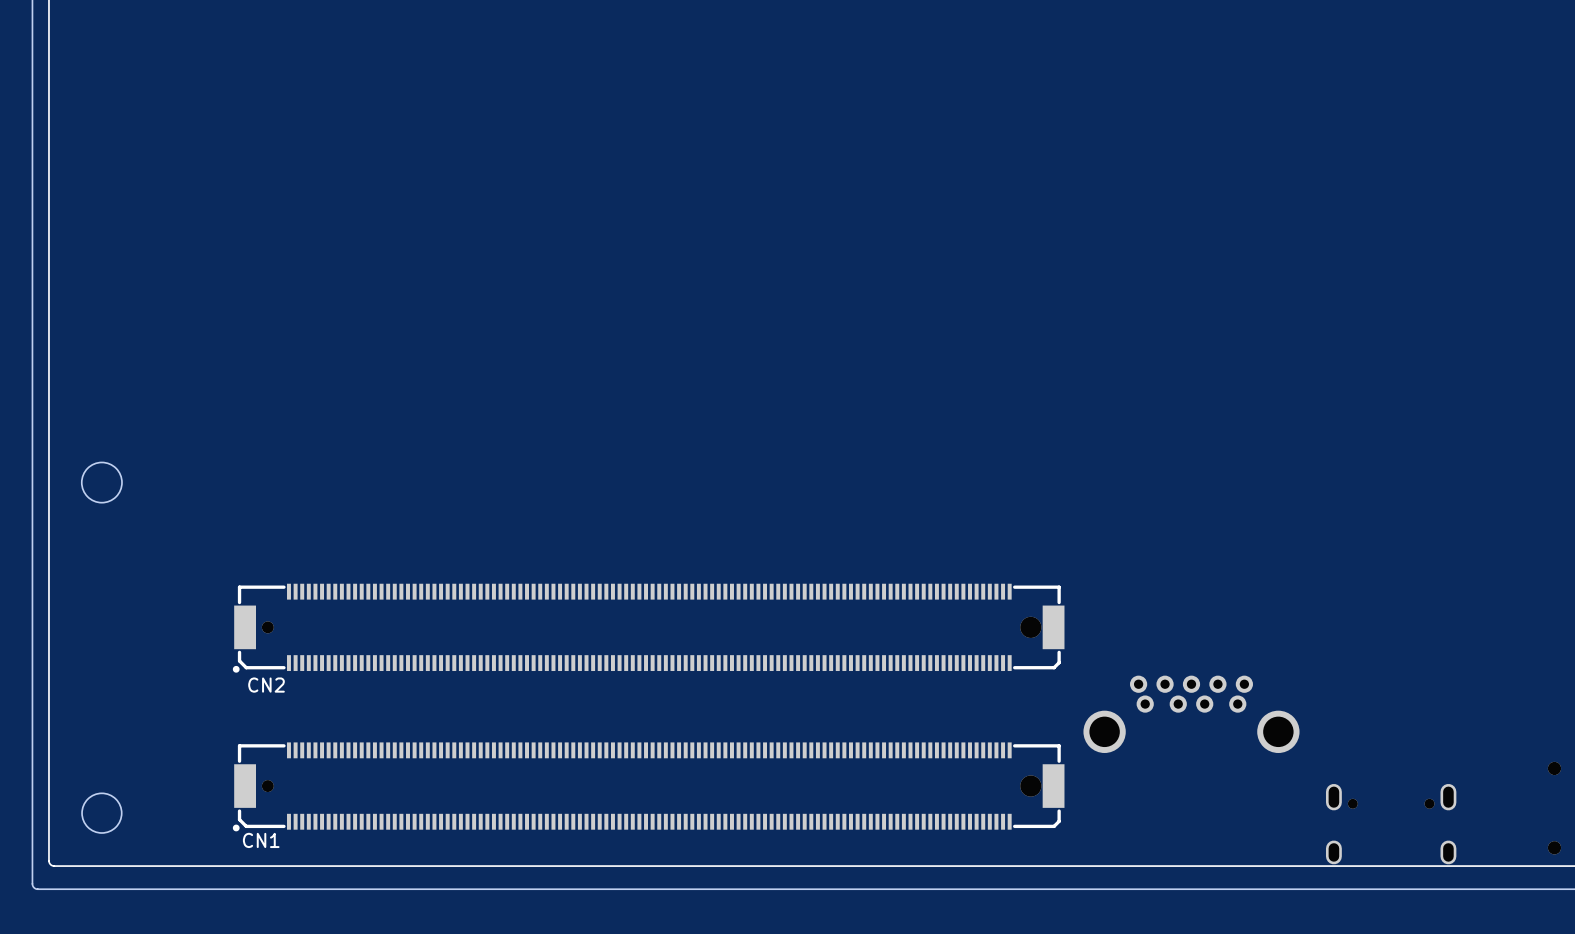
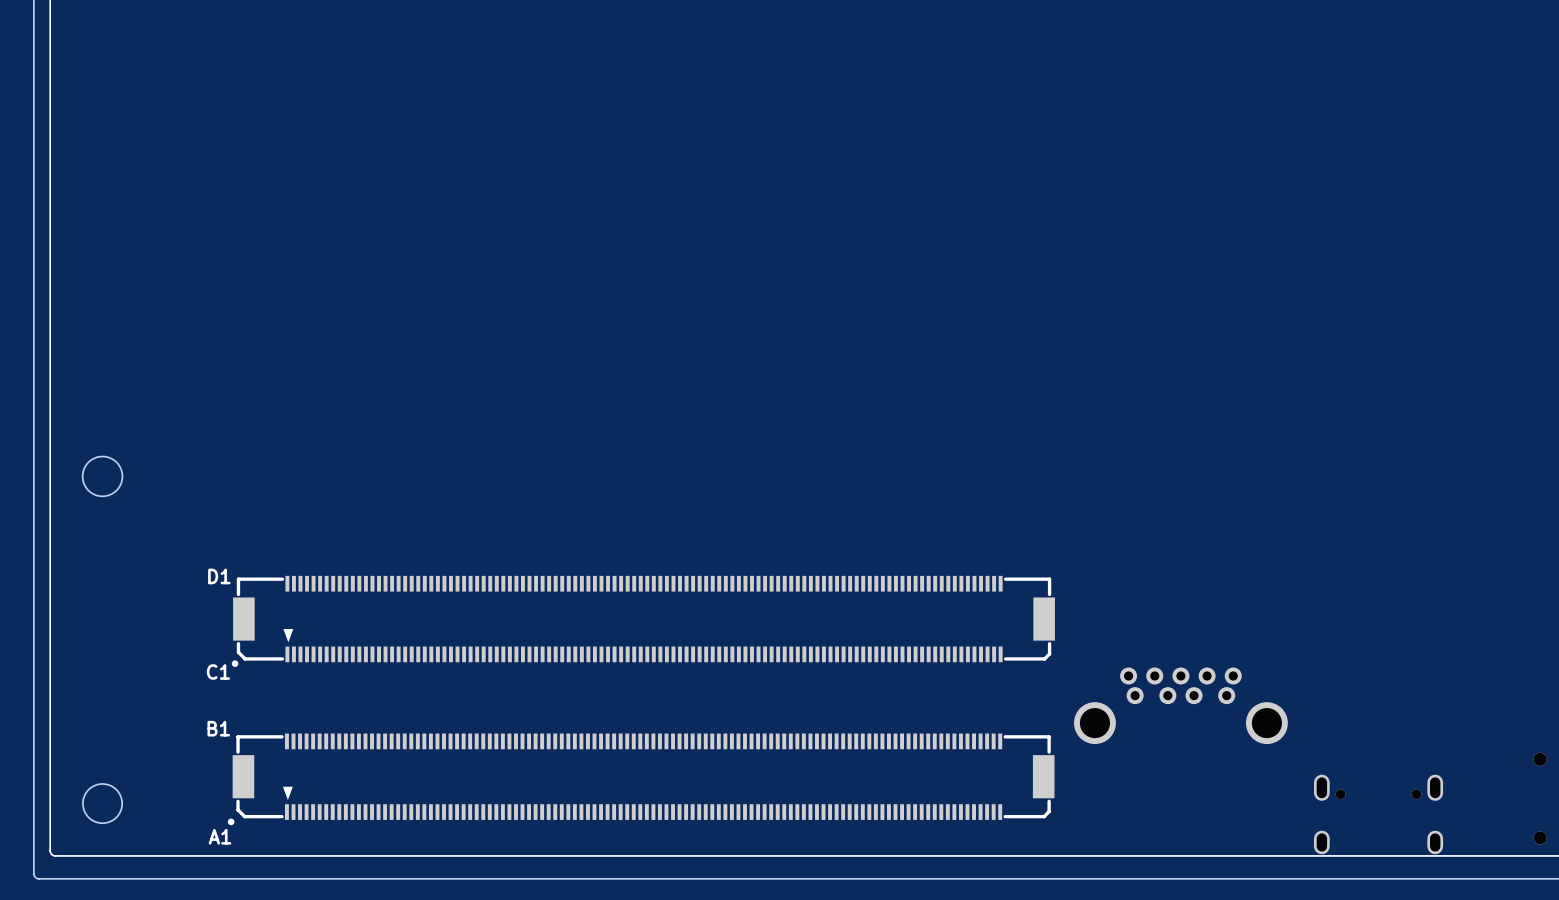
CN2: (648, 628) -> none
part: none -> (641, 700)
CN1: (648, 786) -> none

